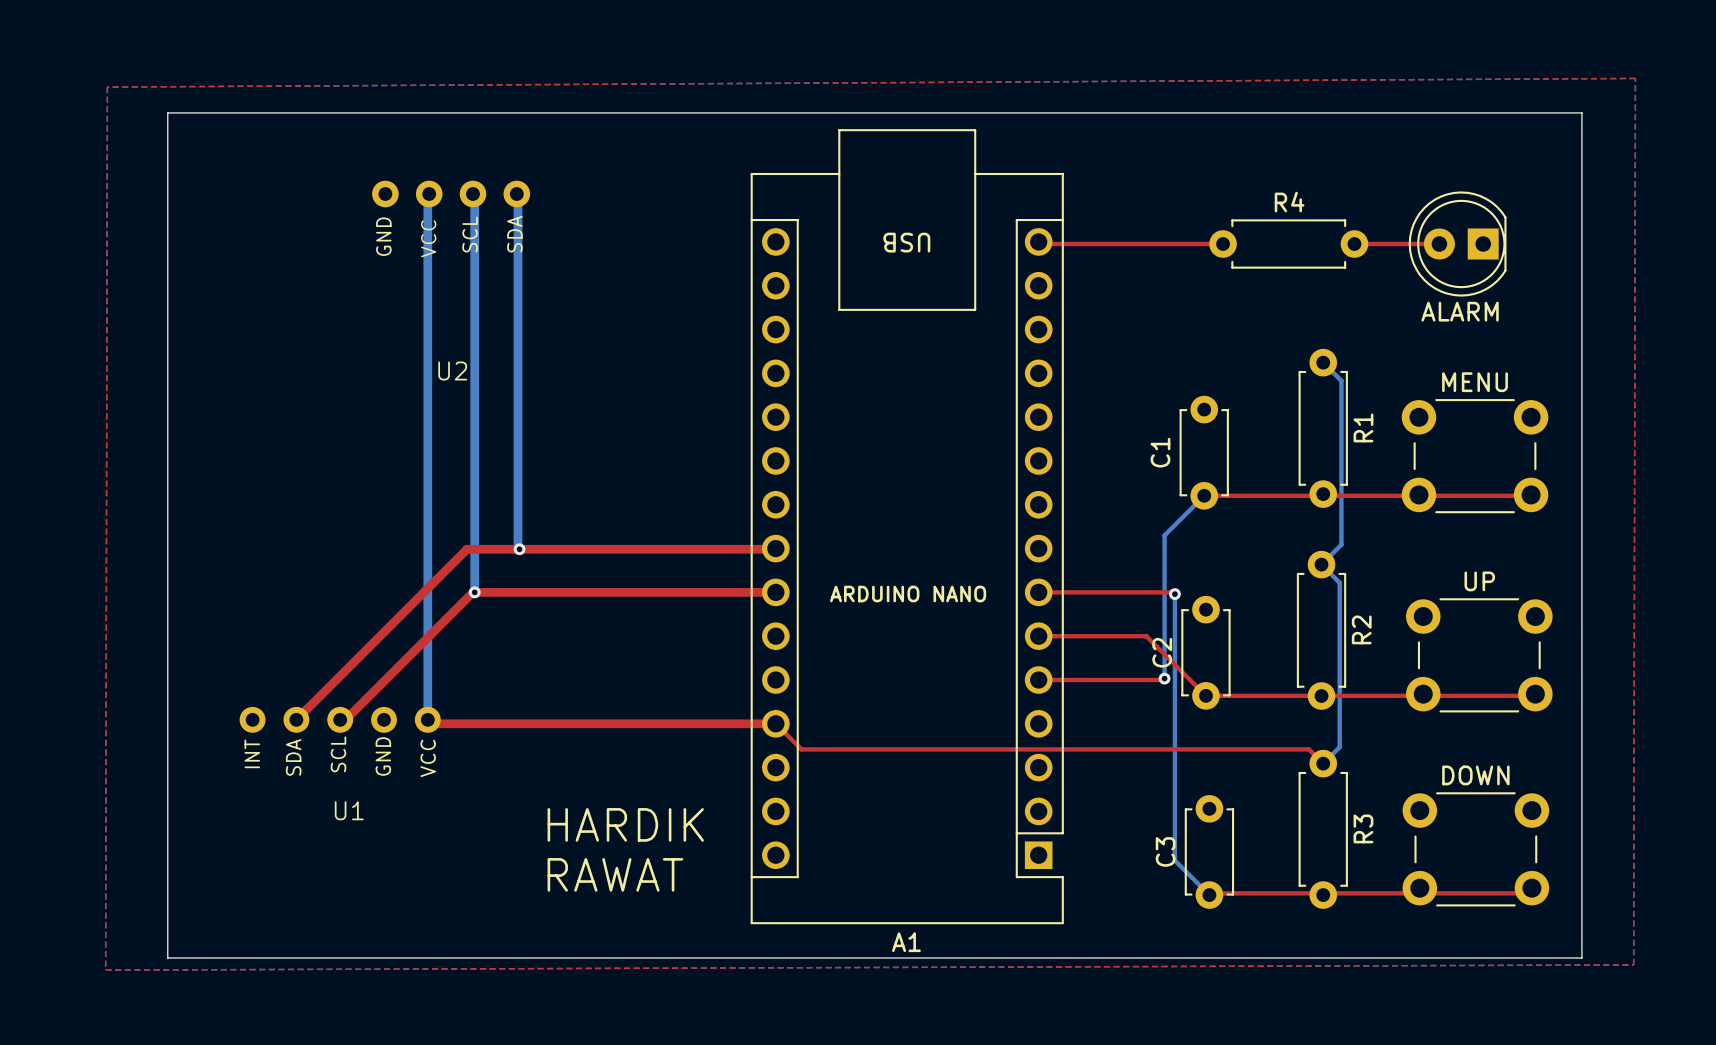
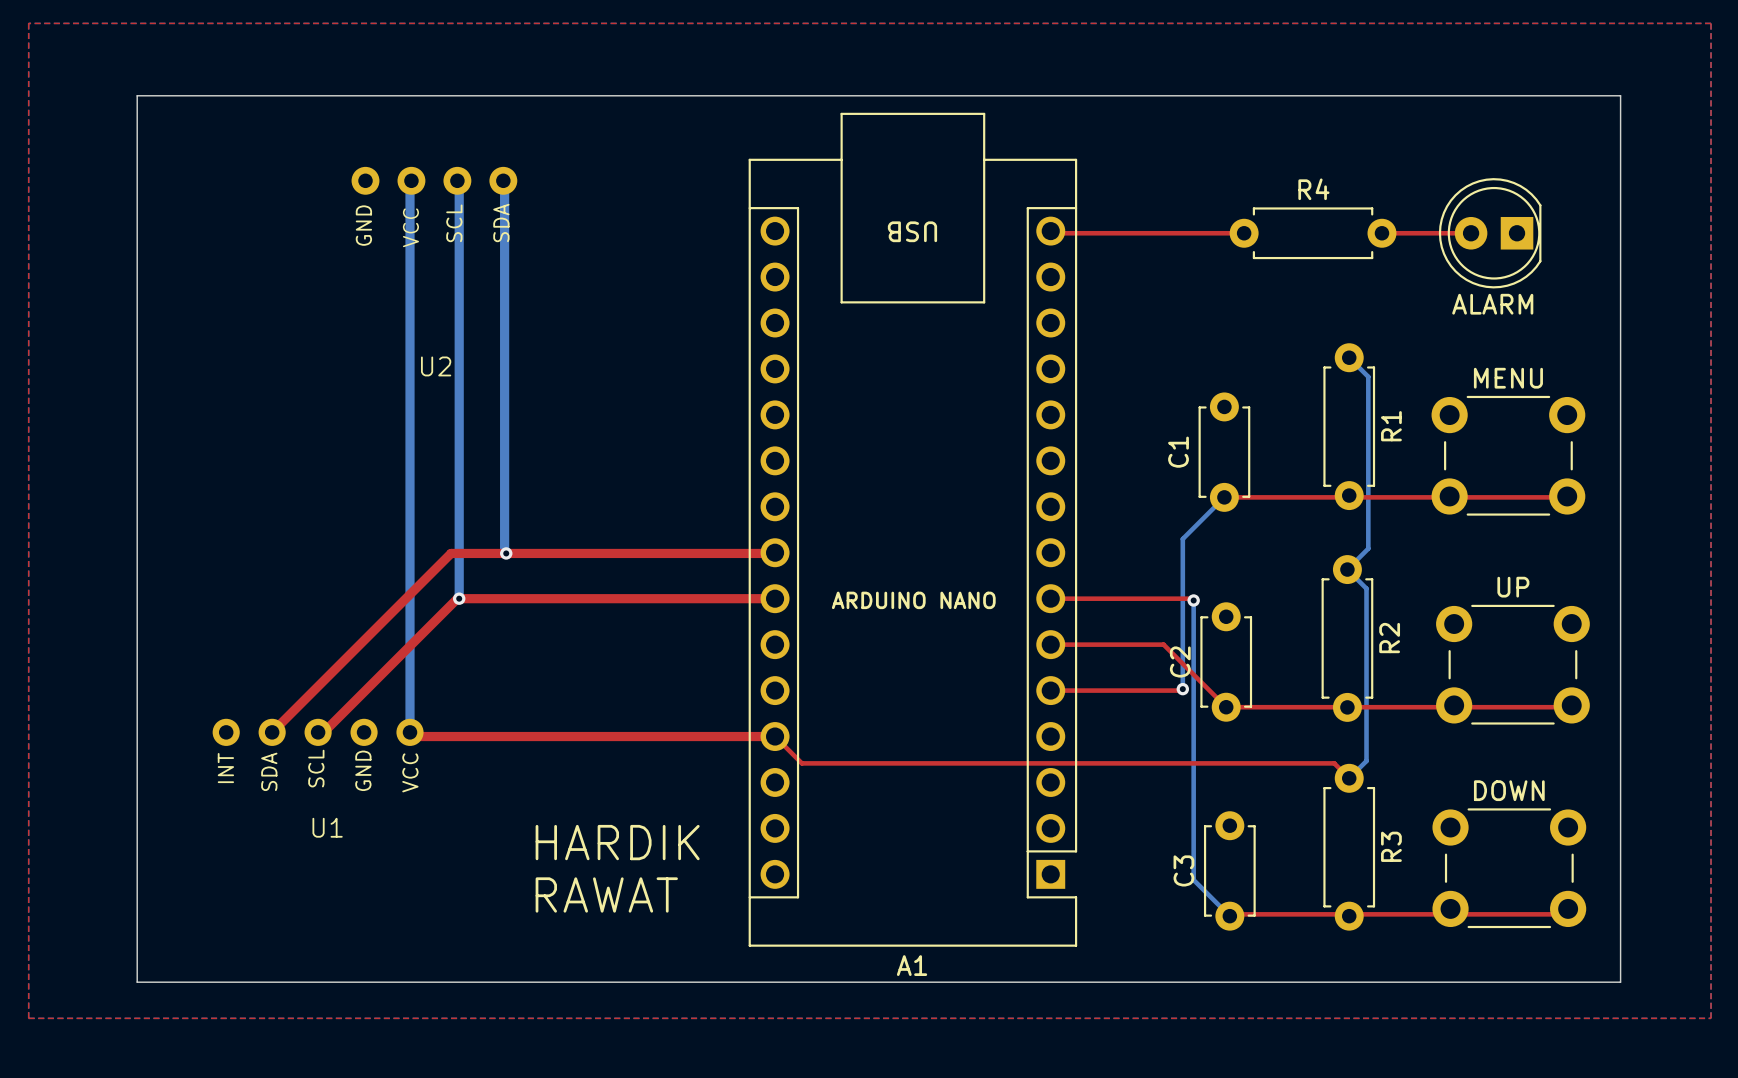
top zone outline: (1635, 78) (1633, 964) (105, 970) (107, 87) (1635, 78) -> (28, 23) (28, 1018) (1711, 1018) (1711, 23) (28, 23)

